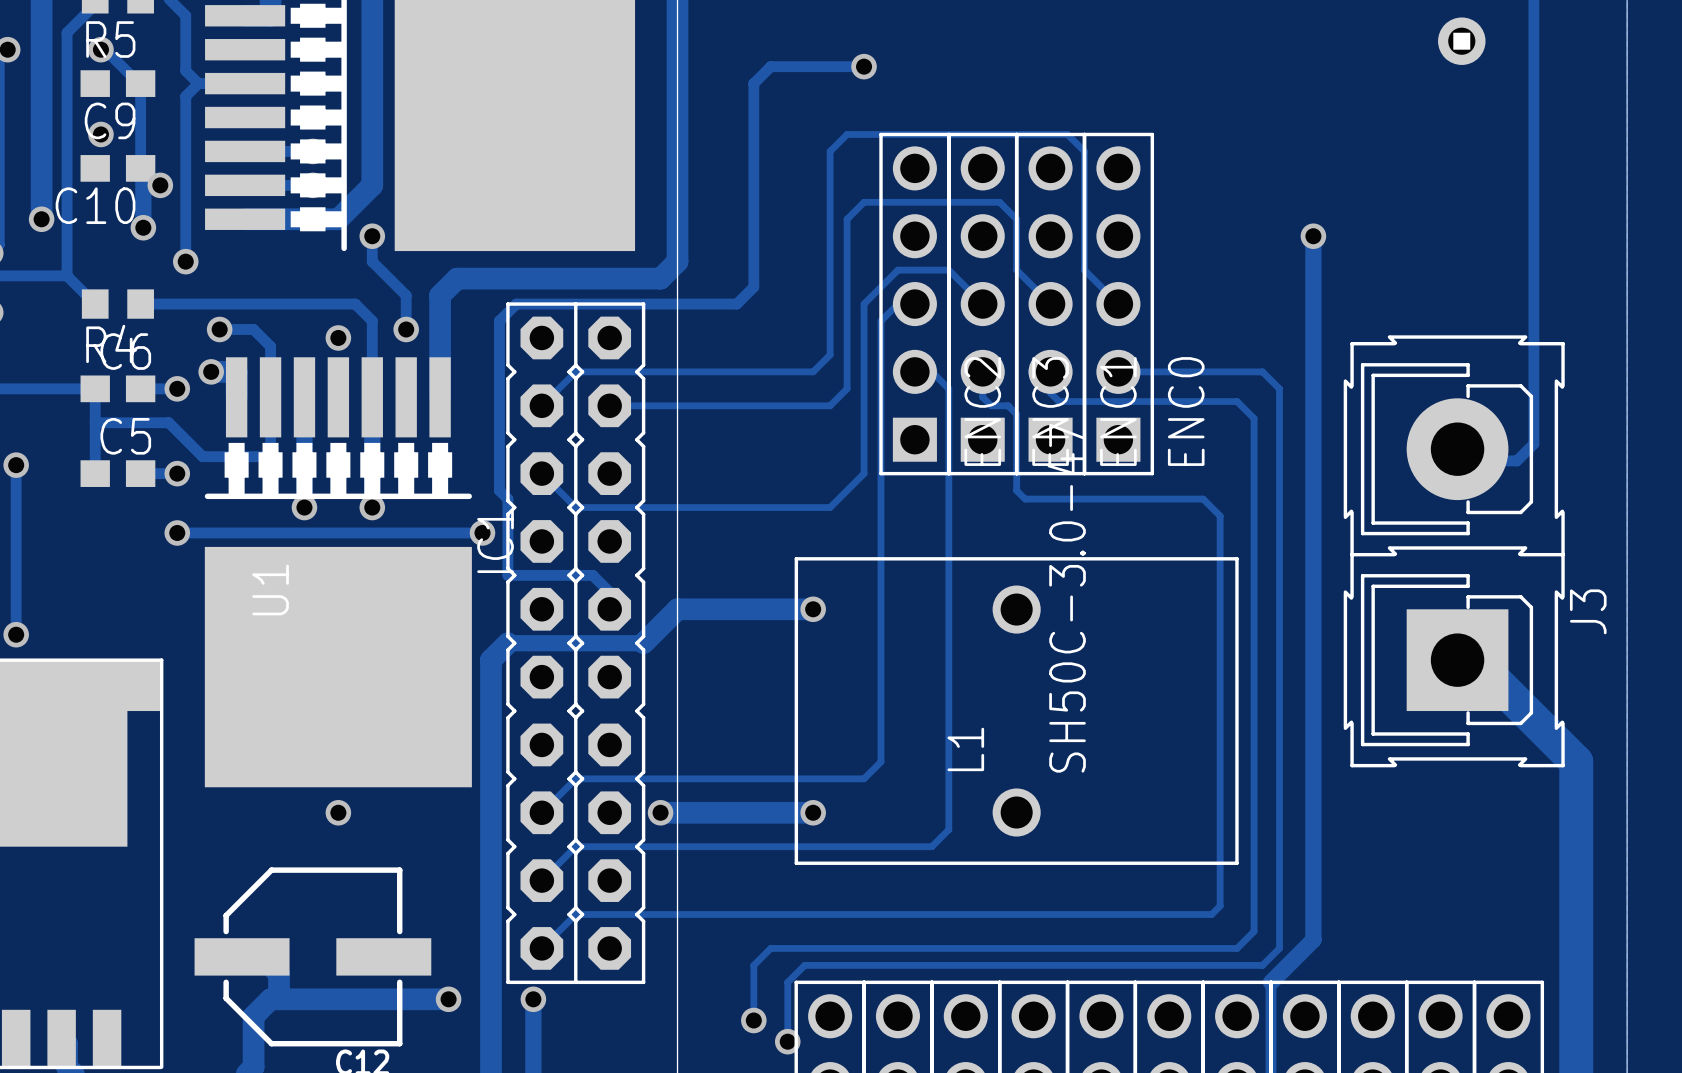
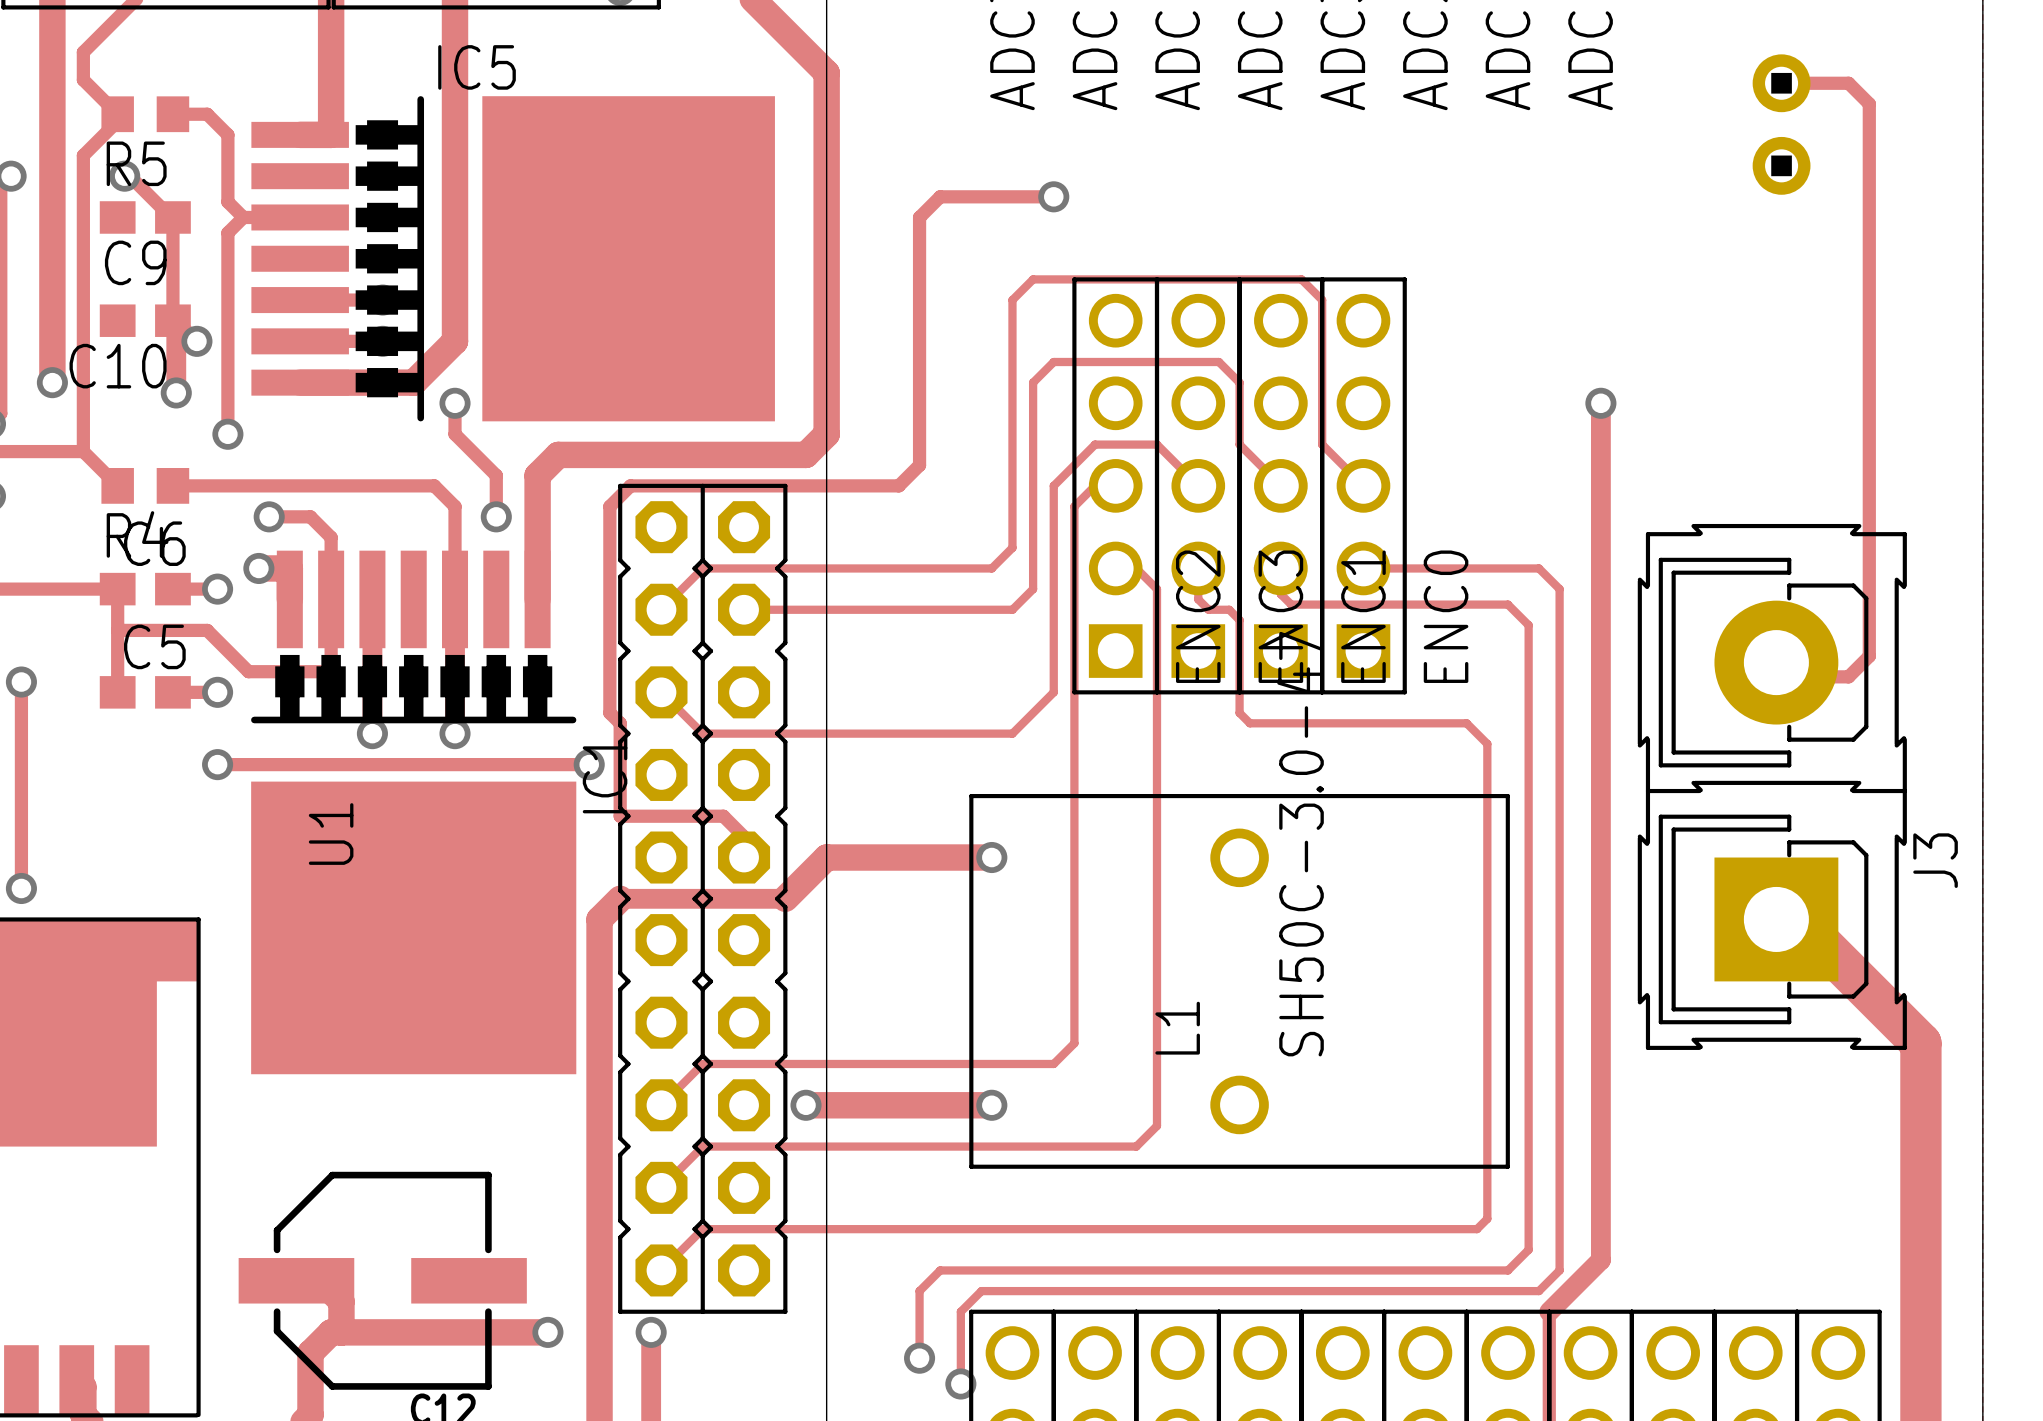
via: (100, 134) -> none
via: (338, 337) -> none
via: (338, 812) -> none

